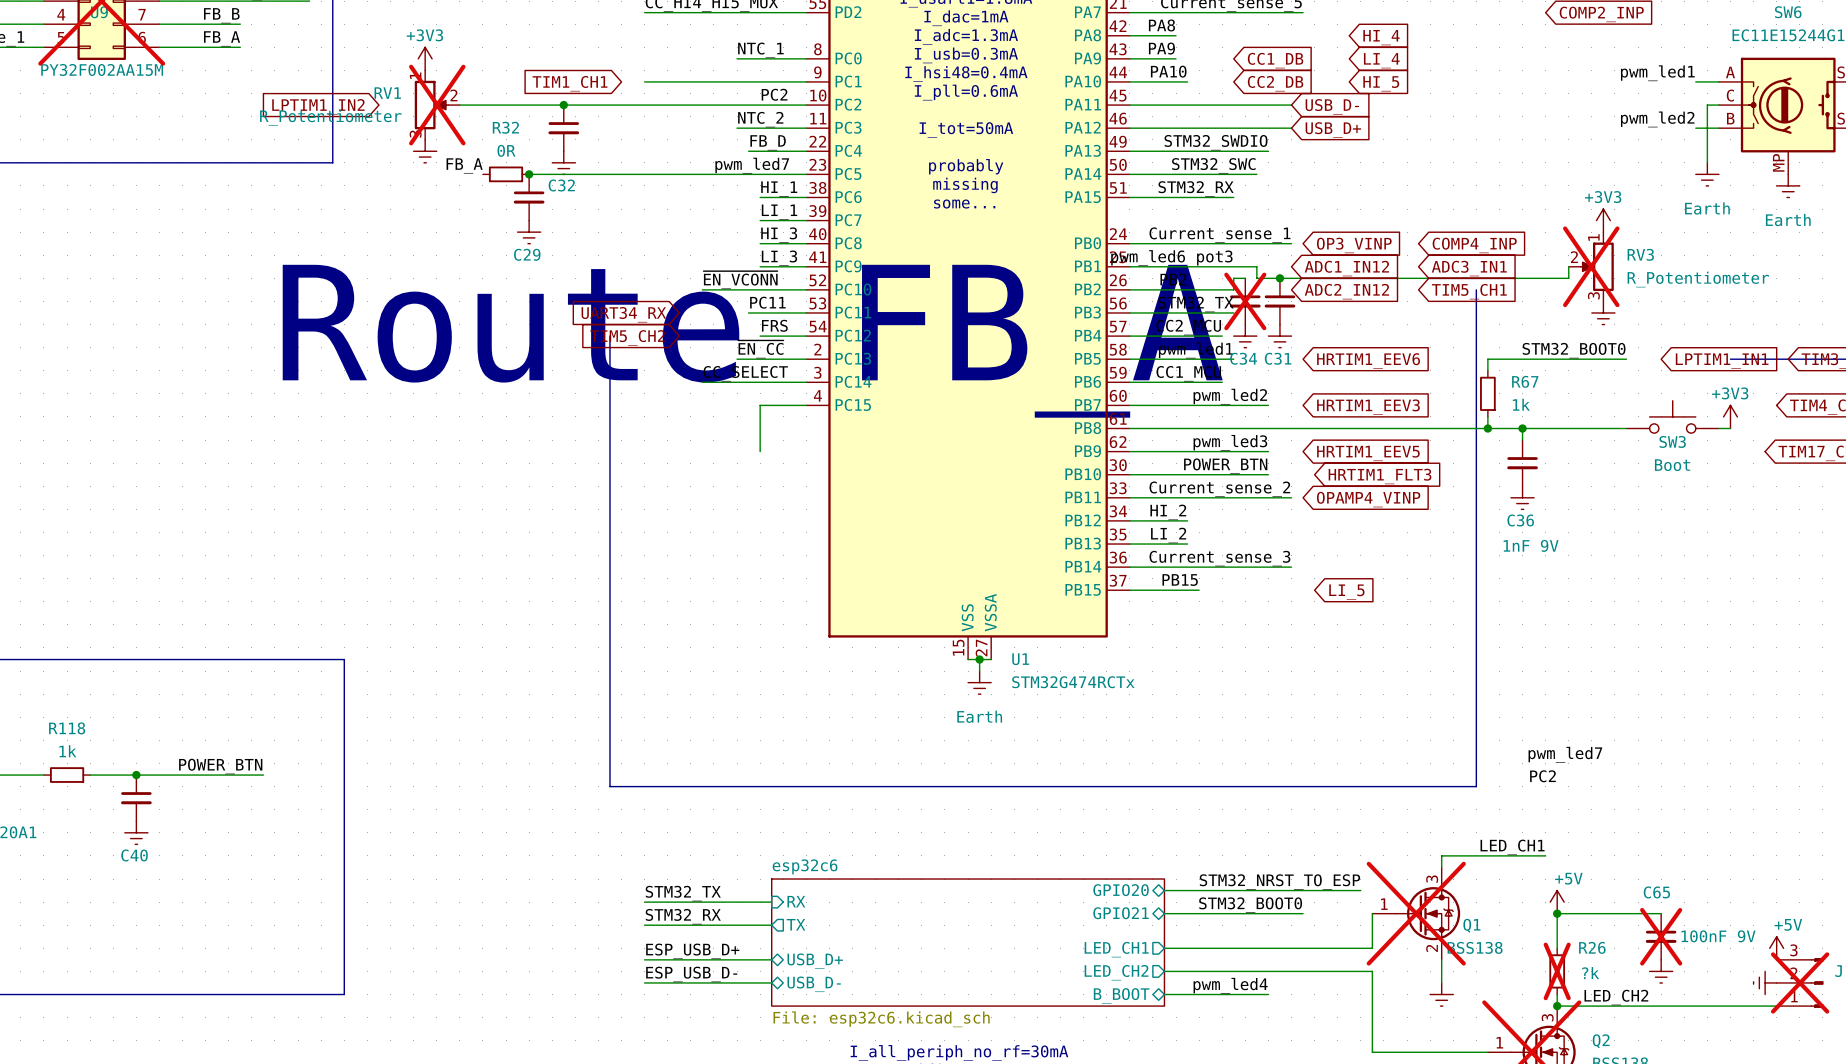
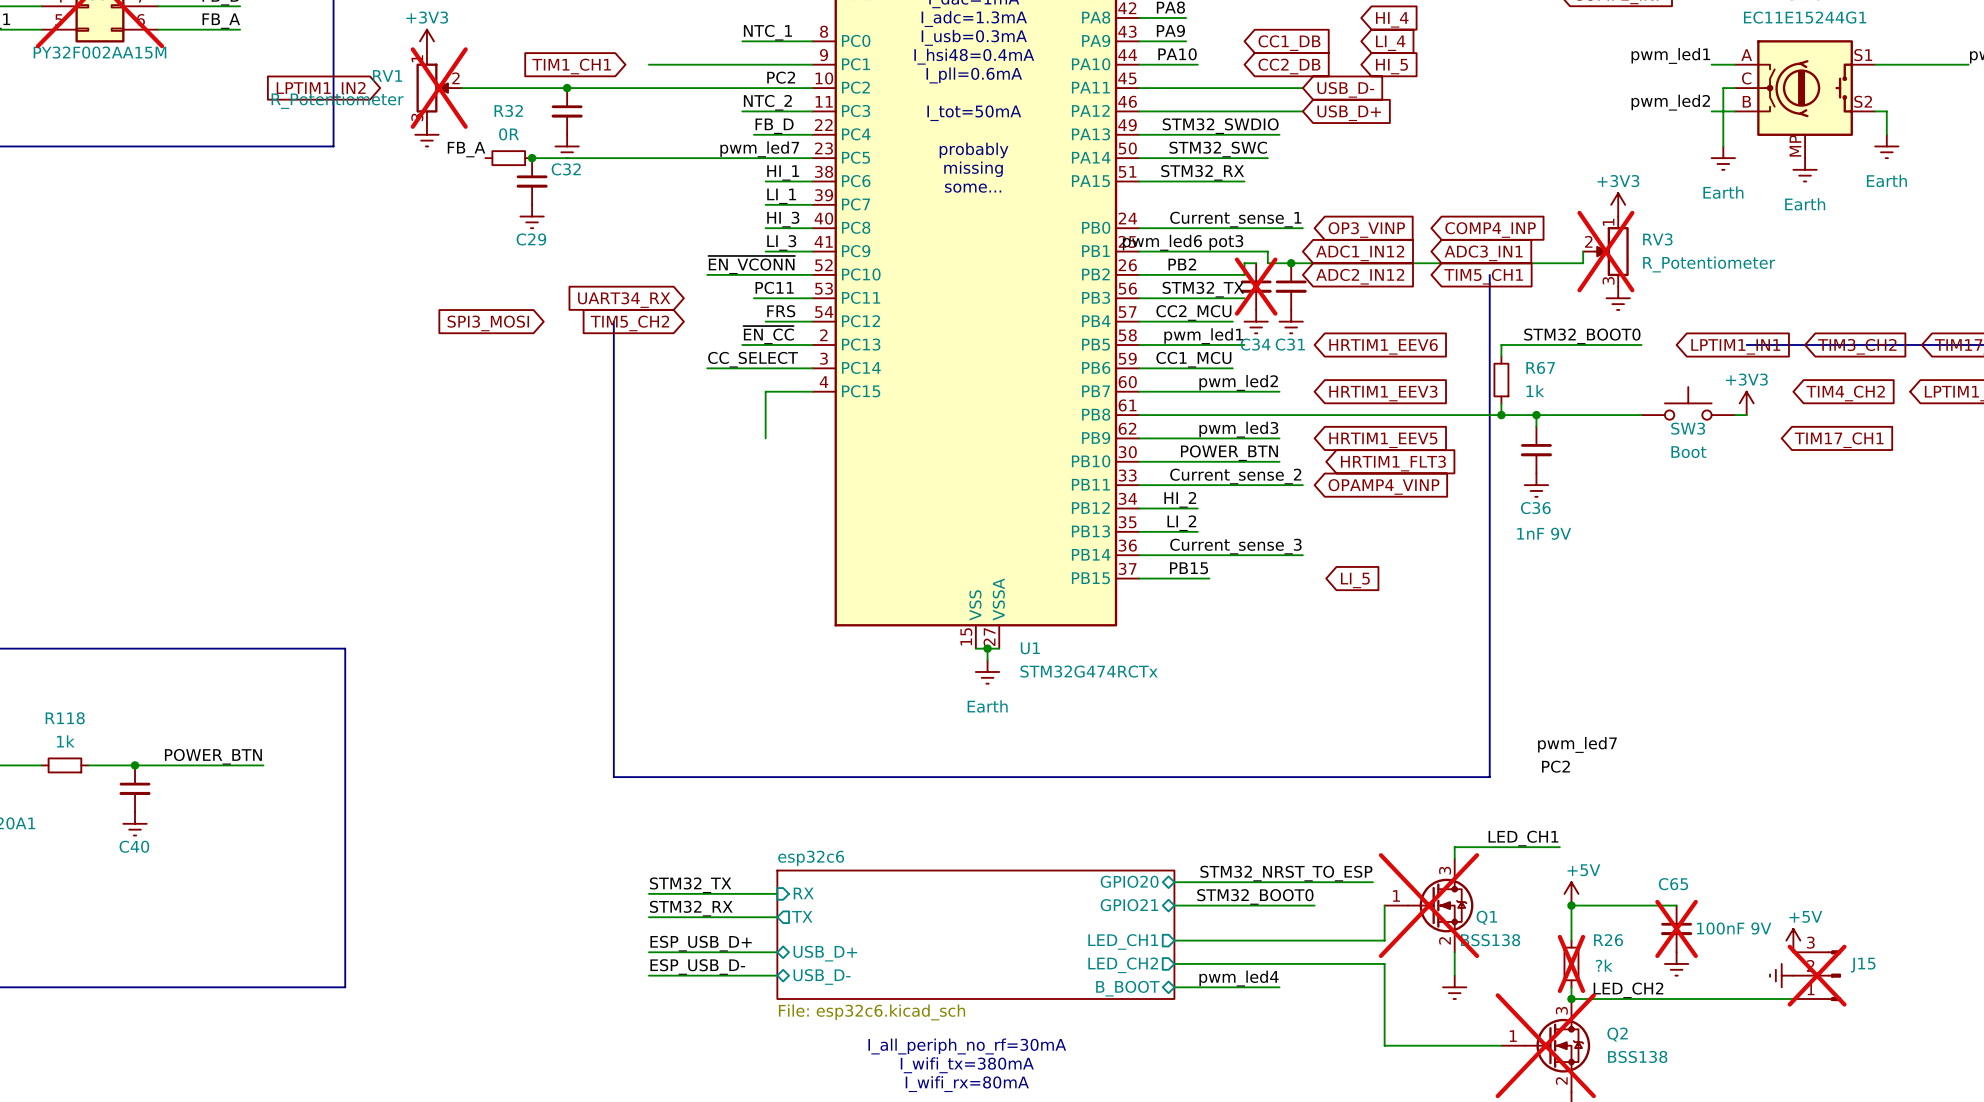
global label: none -> SPI3_MOSI (488, 323)
text: Route FB_A (752, 341) -> none

